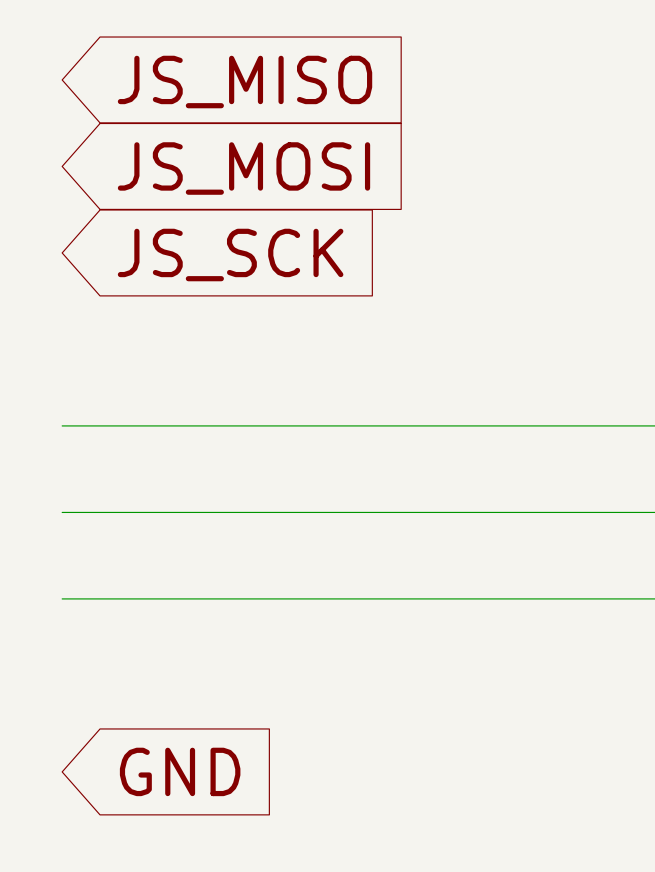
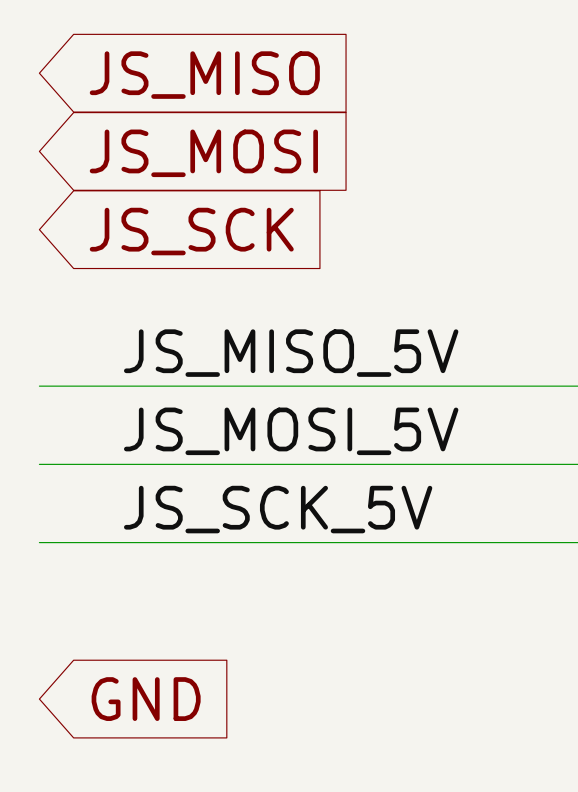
label: none -> JS_MISO_5V (291, 353)
label: none -> JS_MOSI_5V (291, 431)
label: none -> JS_SCK_5V (278, 509)

